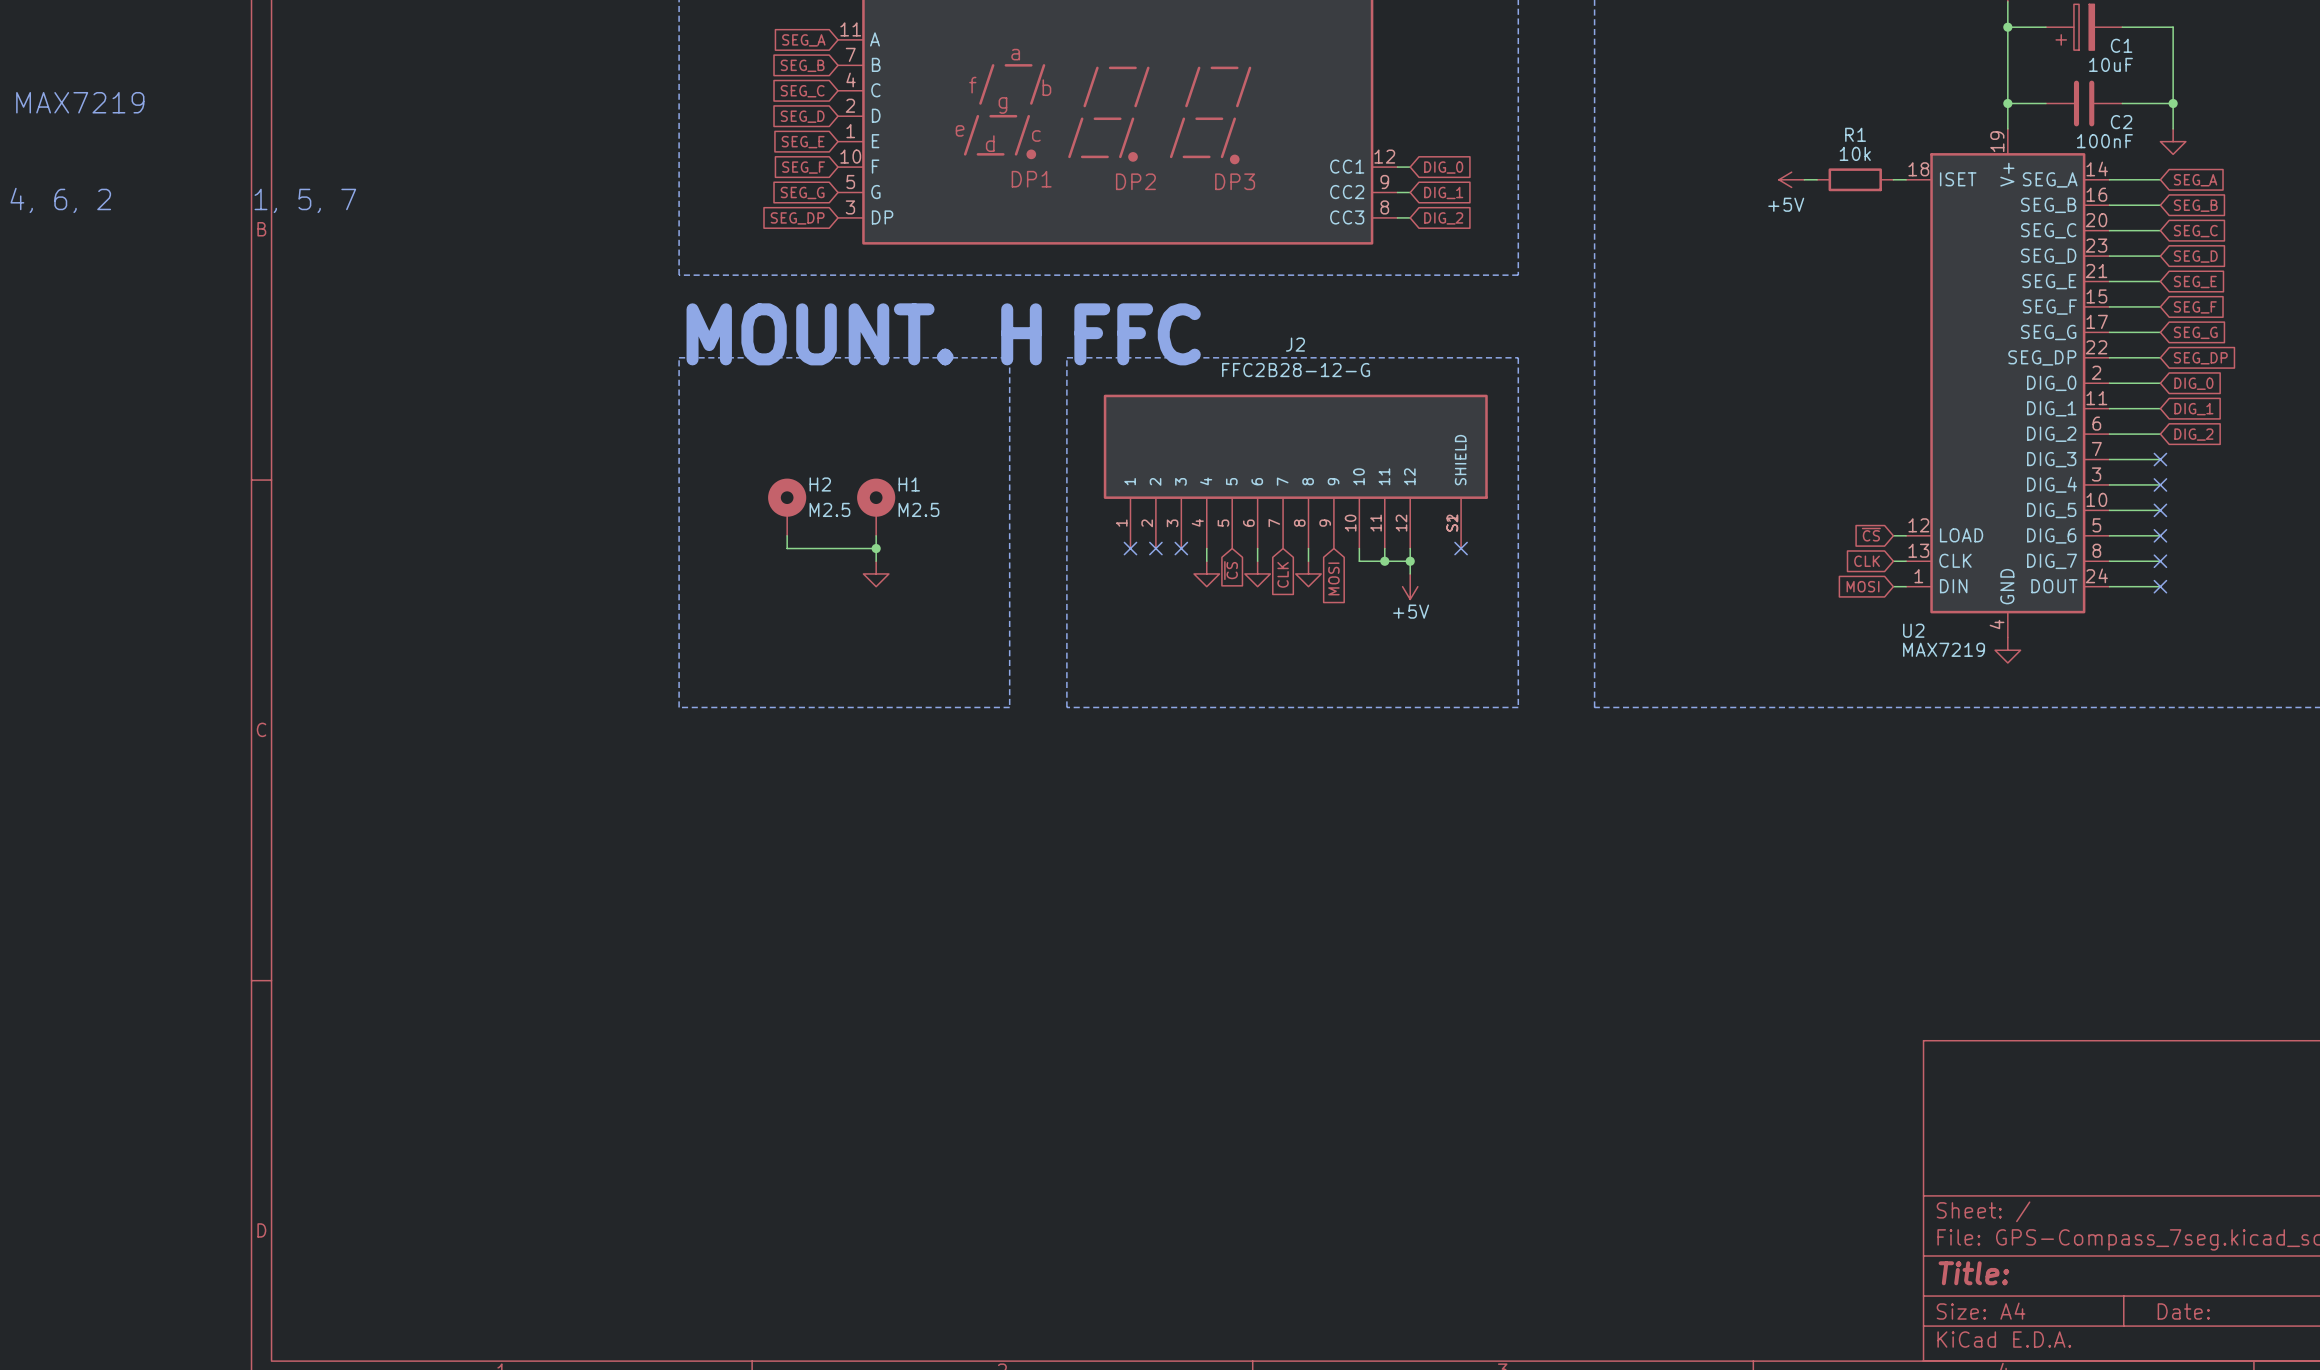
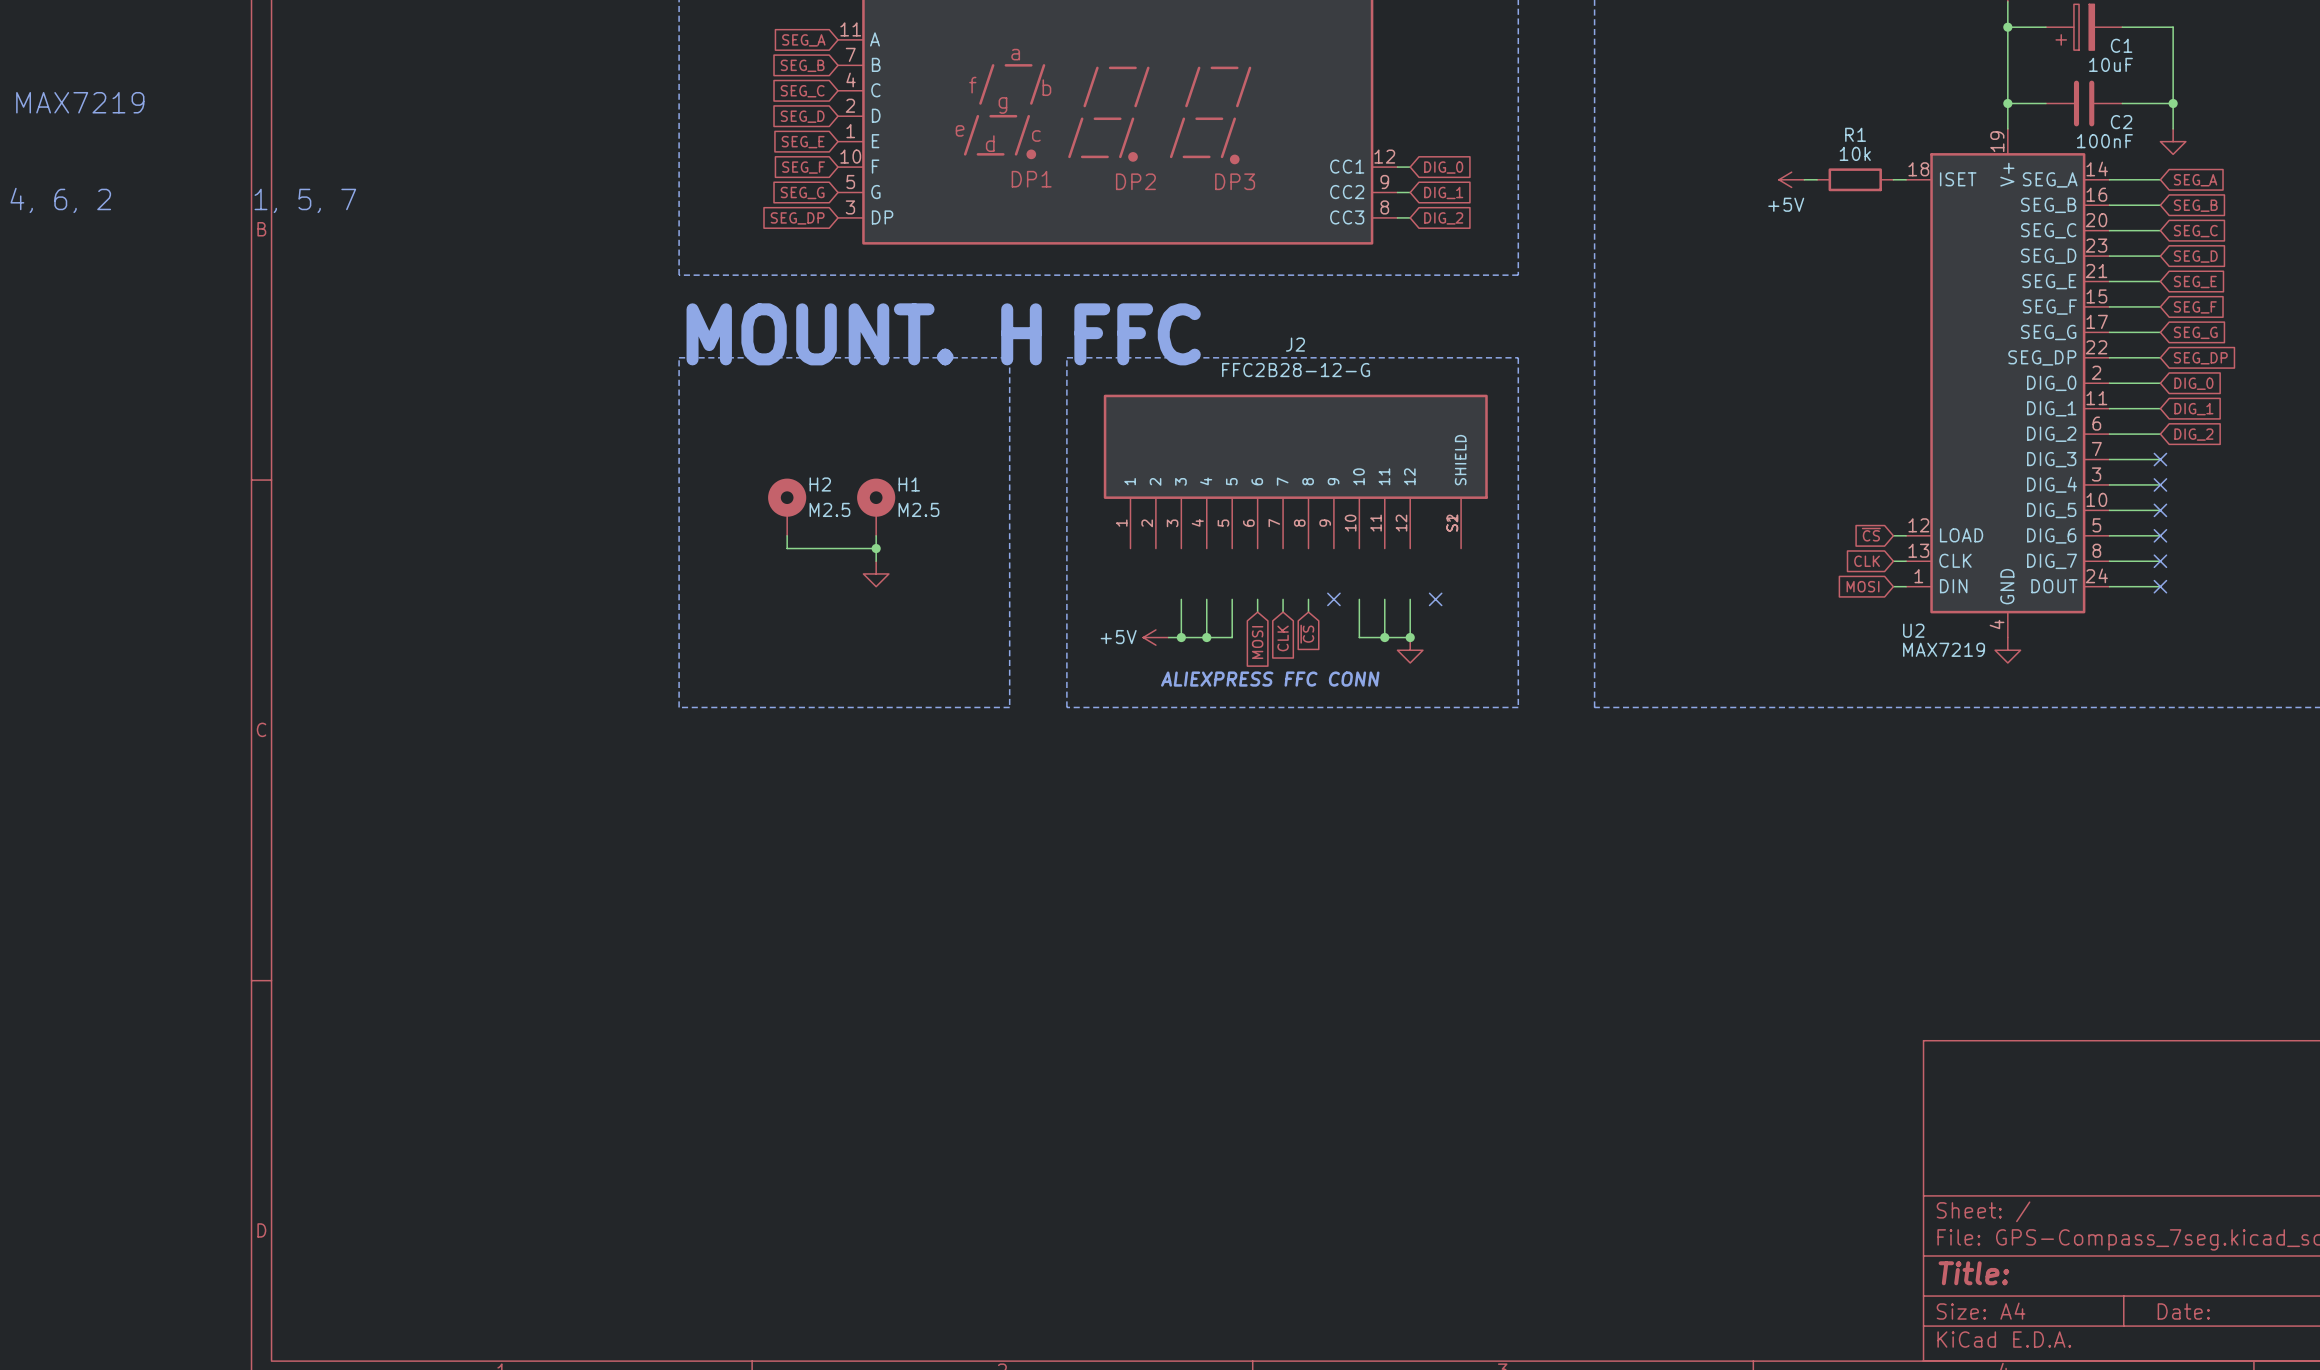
no-connect mark: (1130, 548) -> none
no-connect mark: (1155, 548) -> none
no-connect mark: (1181, 548) -> none
wire: (1206, 548) (1206, 561) -> (1283, 599) (1283, 612)
wire: (1257, 548) (1257, 561) -> (1257, 599) (1257, 612)
wire: (1308, 548) (1308, 561) -> (1308, 599) (1308, 612)
wire: (1359, 548) (1359, 561) (1410, 561) -> none
wire: (1384, 548) (1384, 561) -> none
wire: (1410, 548) (1410, 573) -> none
no-connect mark position: (1461, 548) -> (1435, 599)
junction: (1384, 561) -> none
junction: (1410, 561) -> none
global label position: ~{CS} (1231, 570) -> ~{CS} (1307, 634)
power symbol: (1206, 573) -> none
power symbol: (1257, 573) -> none
power symbol: (1308, 573) -> none
global label position: CLK (1283, 574) -> CLK (1283, 638)
global label position: MOSI (1333, 578) -> MOSI (1257, 642)
power symbol: +5V (1410, 586) -> none
wire: none -> (1181, 599) (1181, 637)
wire: none -> (1206, 599) (1206, 637)
wire: none -> (1232, 599) (1232, 637) (1168, 637)
no-connect mark: none -> (1333, 599)
wire: none -> (1359, 599) (1359, 637) (1410, 637) (1410, 599)
wire: none -> (1384, 599) (1384, 637)
power symbol: none -> +5V (1155, 637)
junction: none -> (1181, 637)
junction: none -> (1206, 637)
junction: none -> (1384, 637)
junction: none -> (1410, 637)
power symbol: none -> (1410, 650)
text: none -> ALIEXPRESS FFC CONN (1270, 679)

